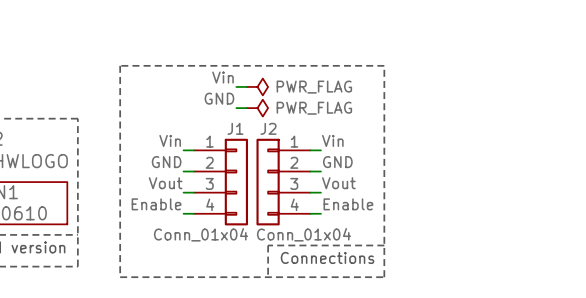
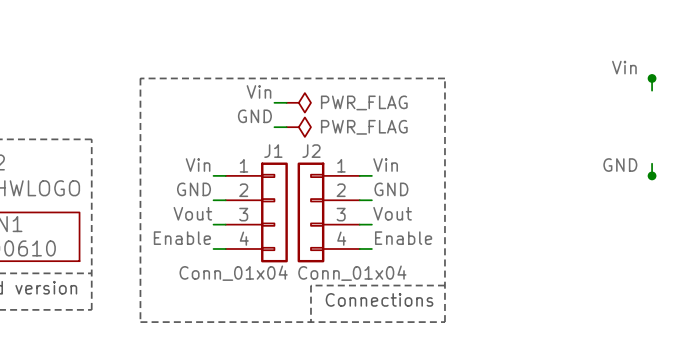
label: none -> Vin (624, 67)
wire: none -> (652, 78) (652, 90)
junction: none -> (652, 78)
wire: none -> (652, 163) (652, 175)
label: none -> GND (620, 165)
junction: none -> (652, 175)

